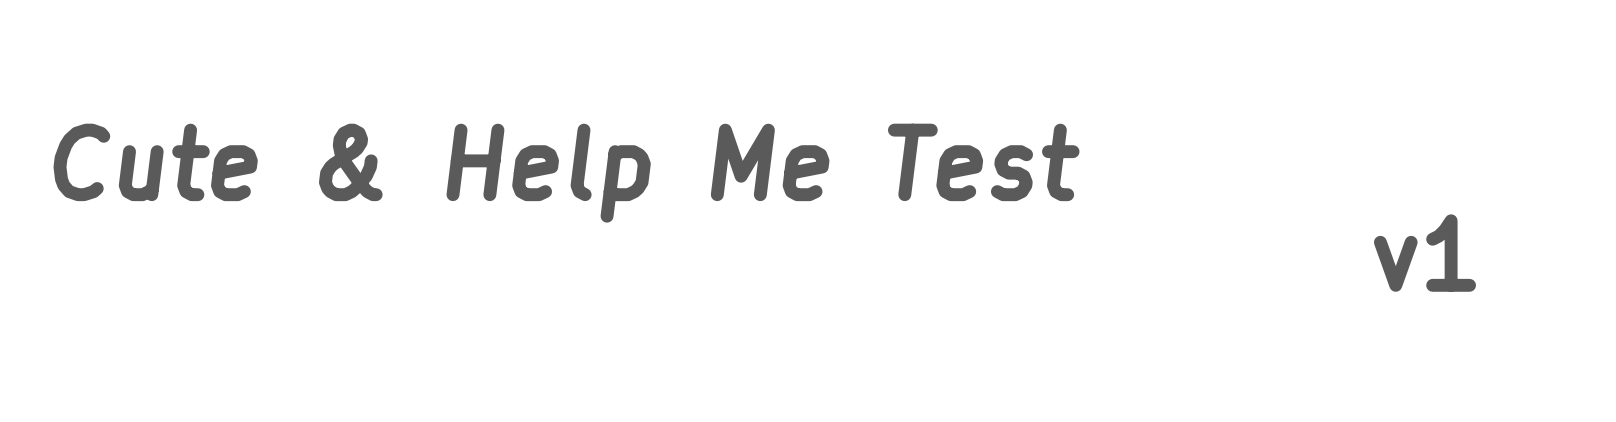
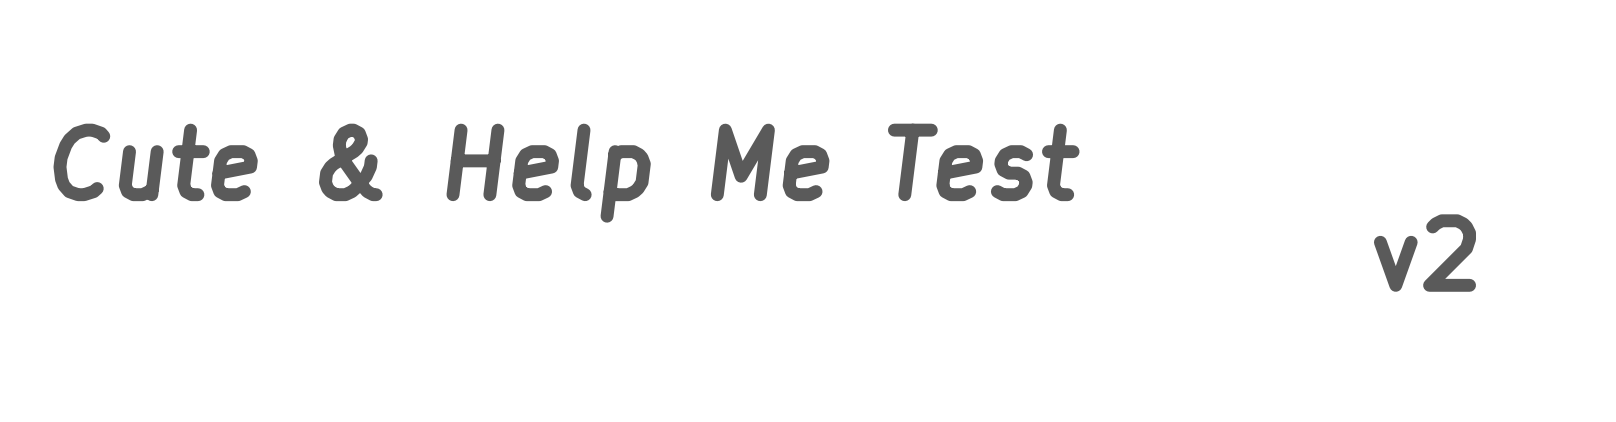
text: v1 (1424, 253) -> v2 (1424, 253)

